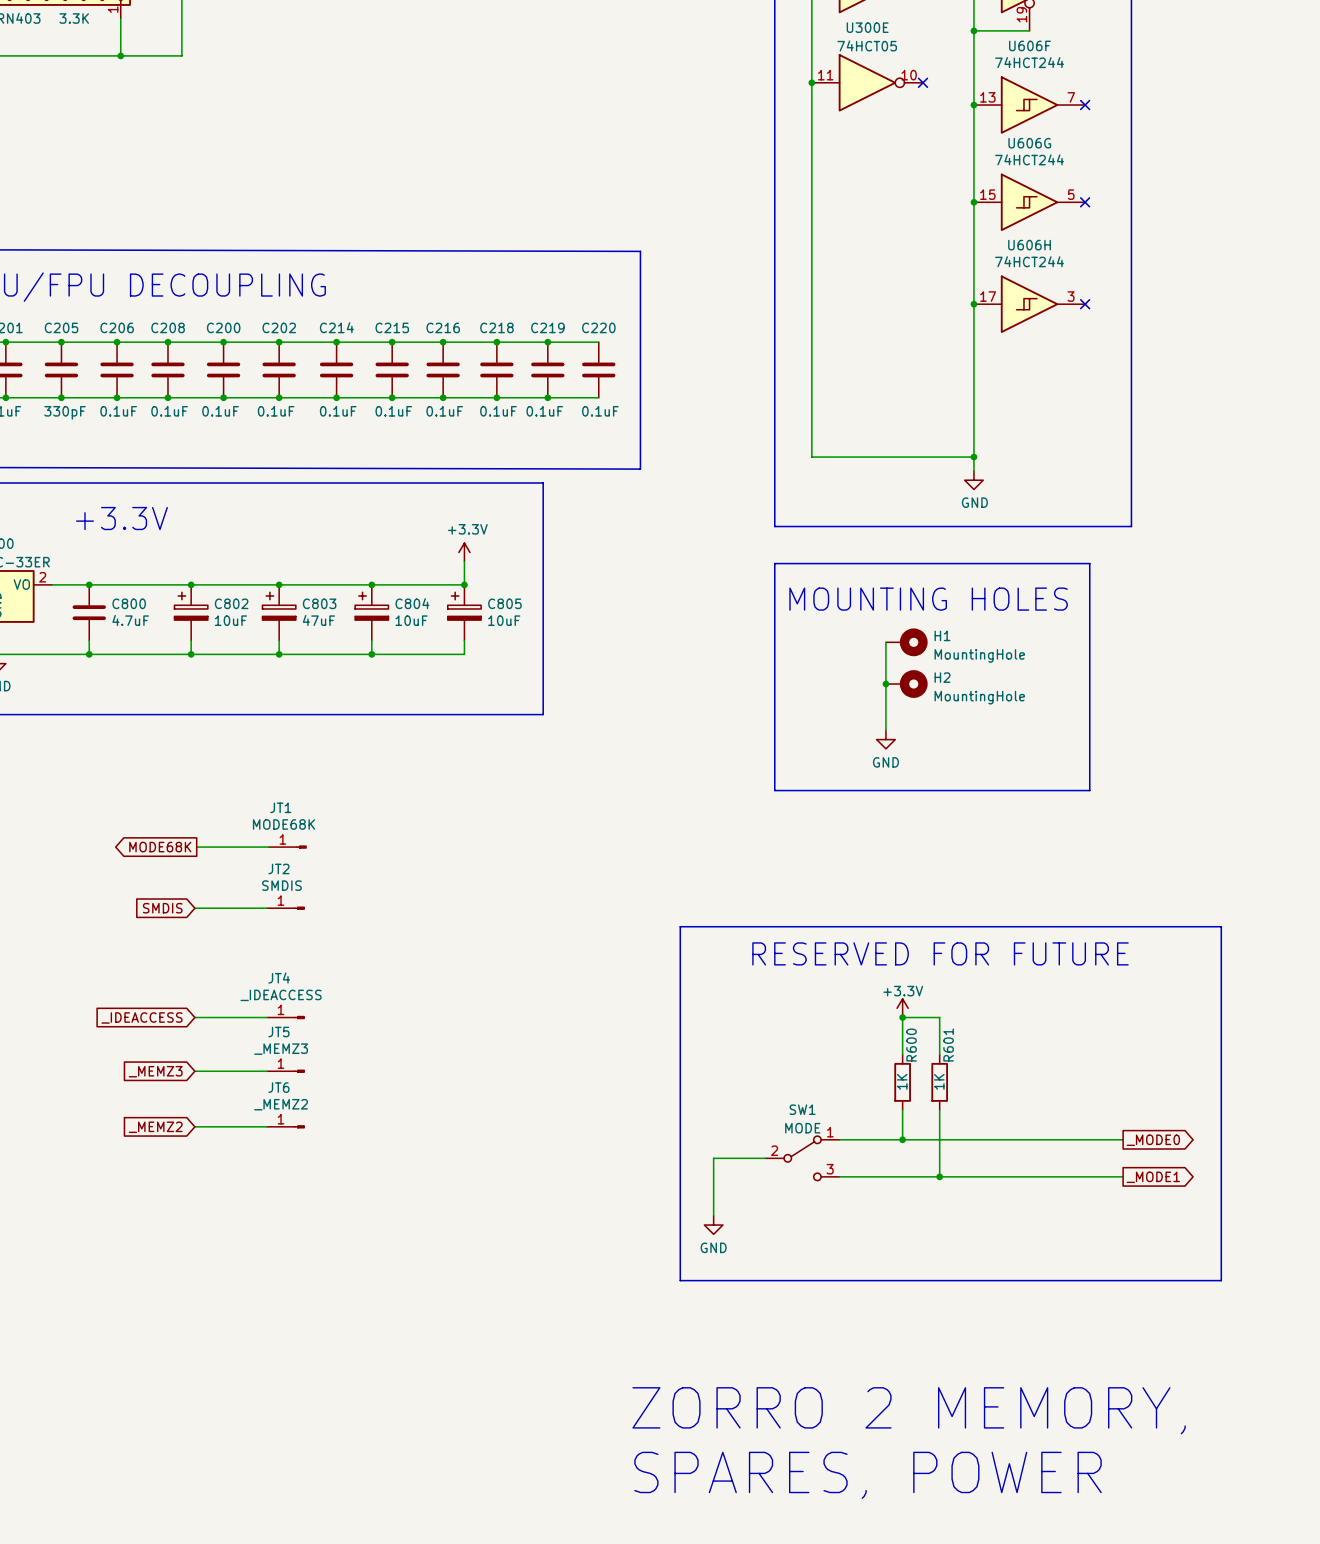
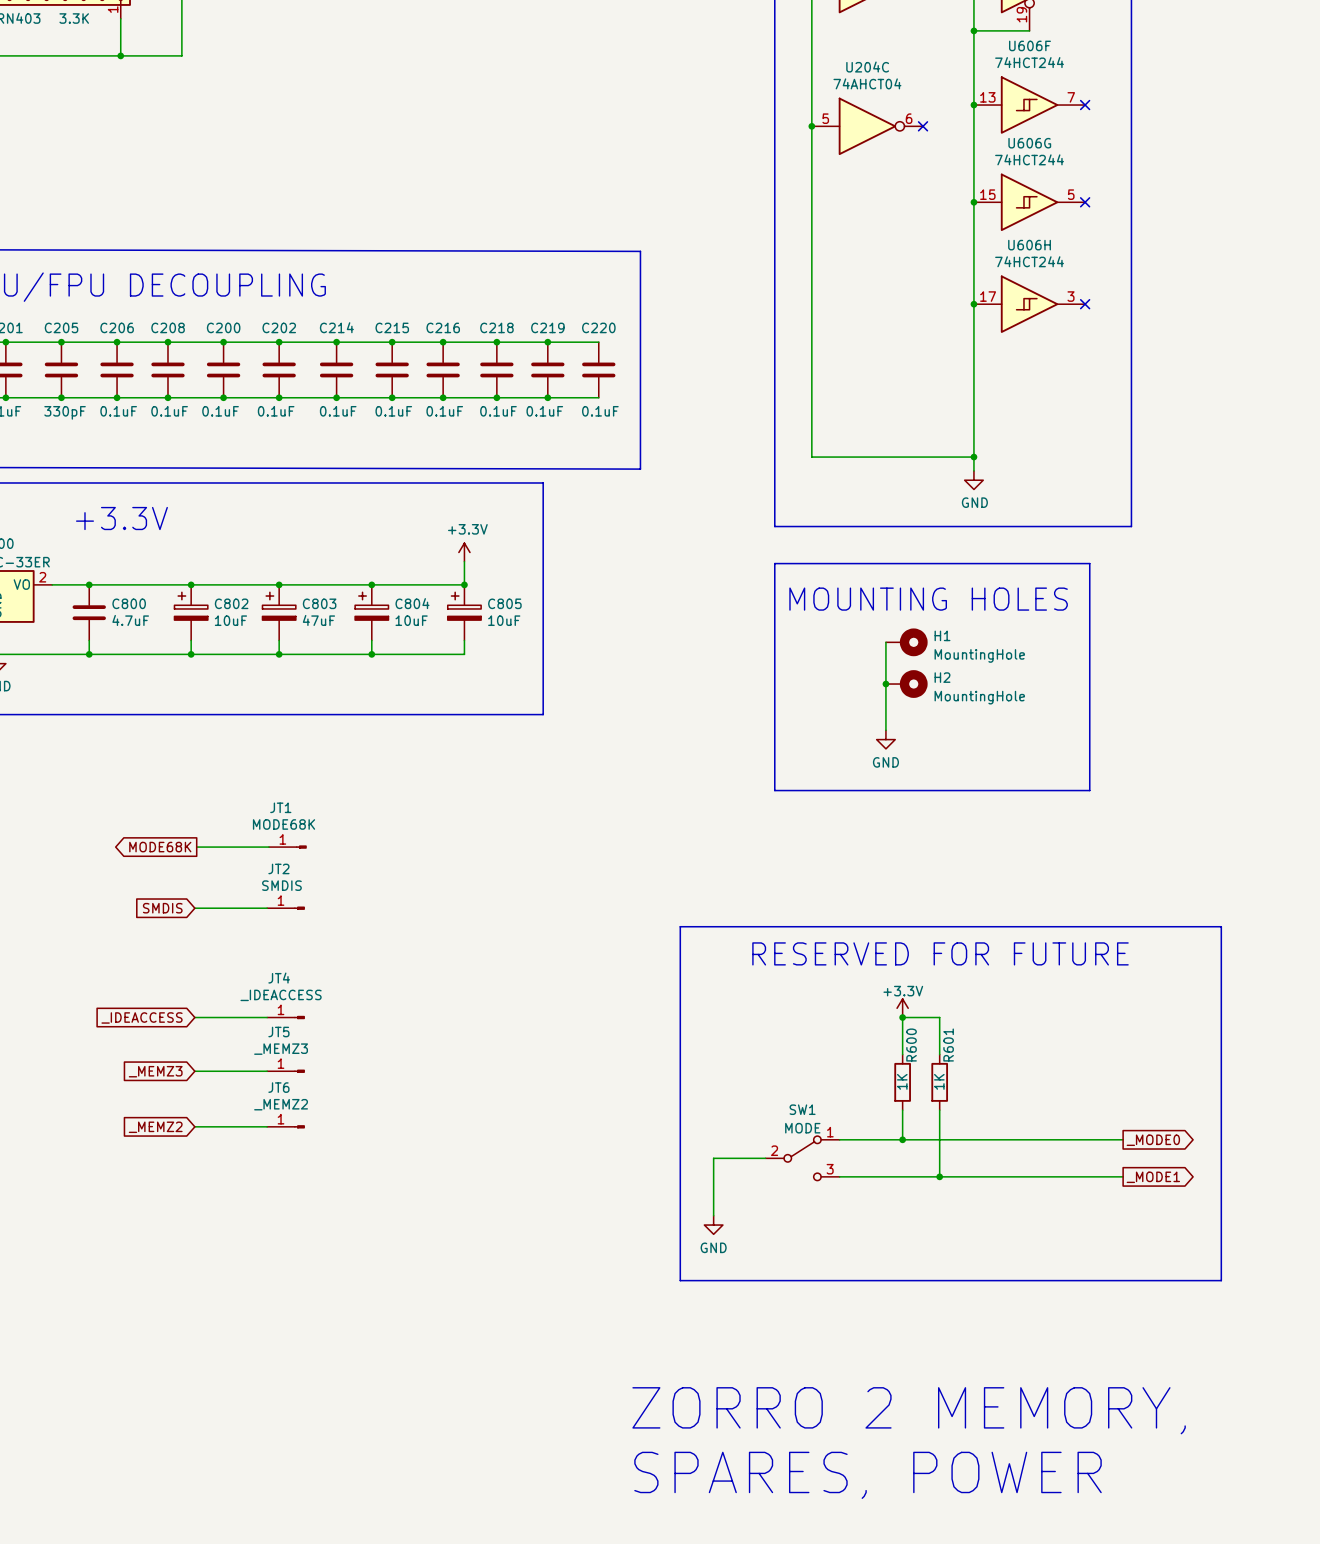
junction position: (811, 82) -> (811, 126)
U300E: 74HCT05 (867, 82) -> none
no-connect mark position: (923, 82) -> (923, 126)
U204C: none -> 74AHCT04 (867, 126)

